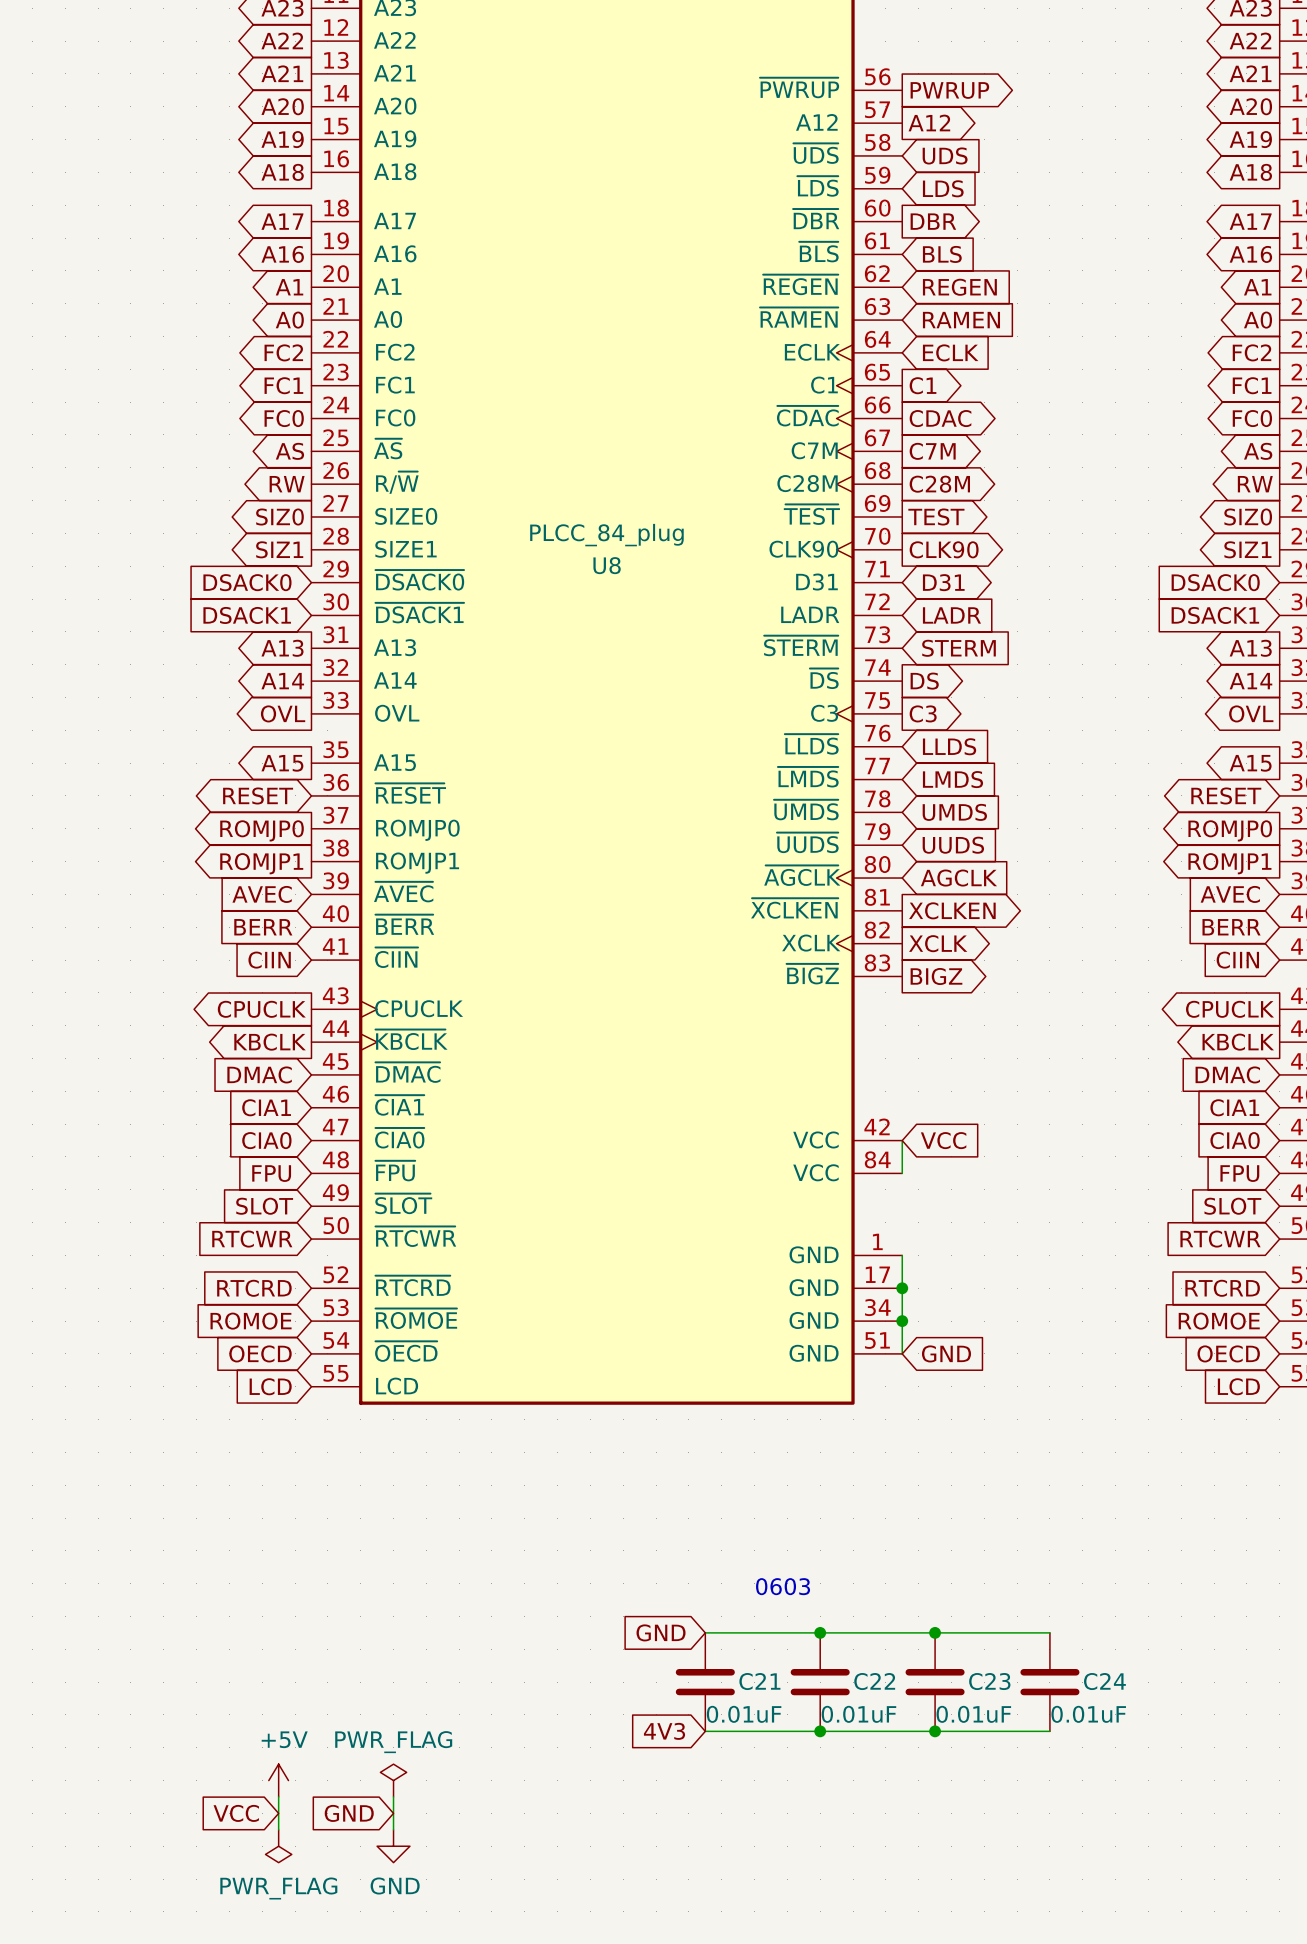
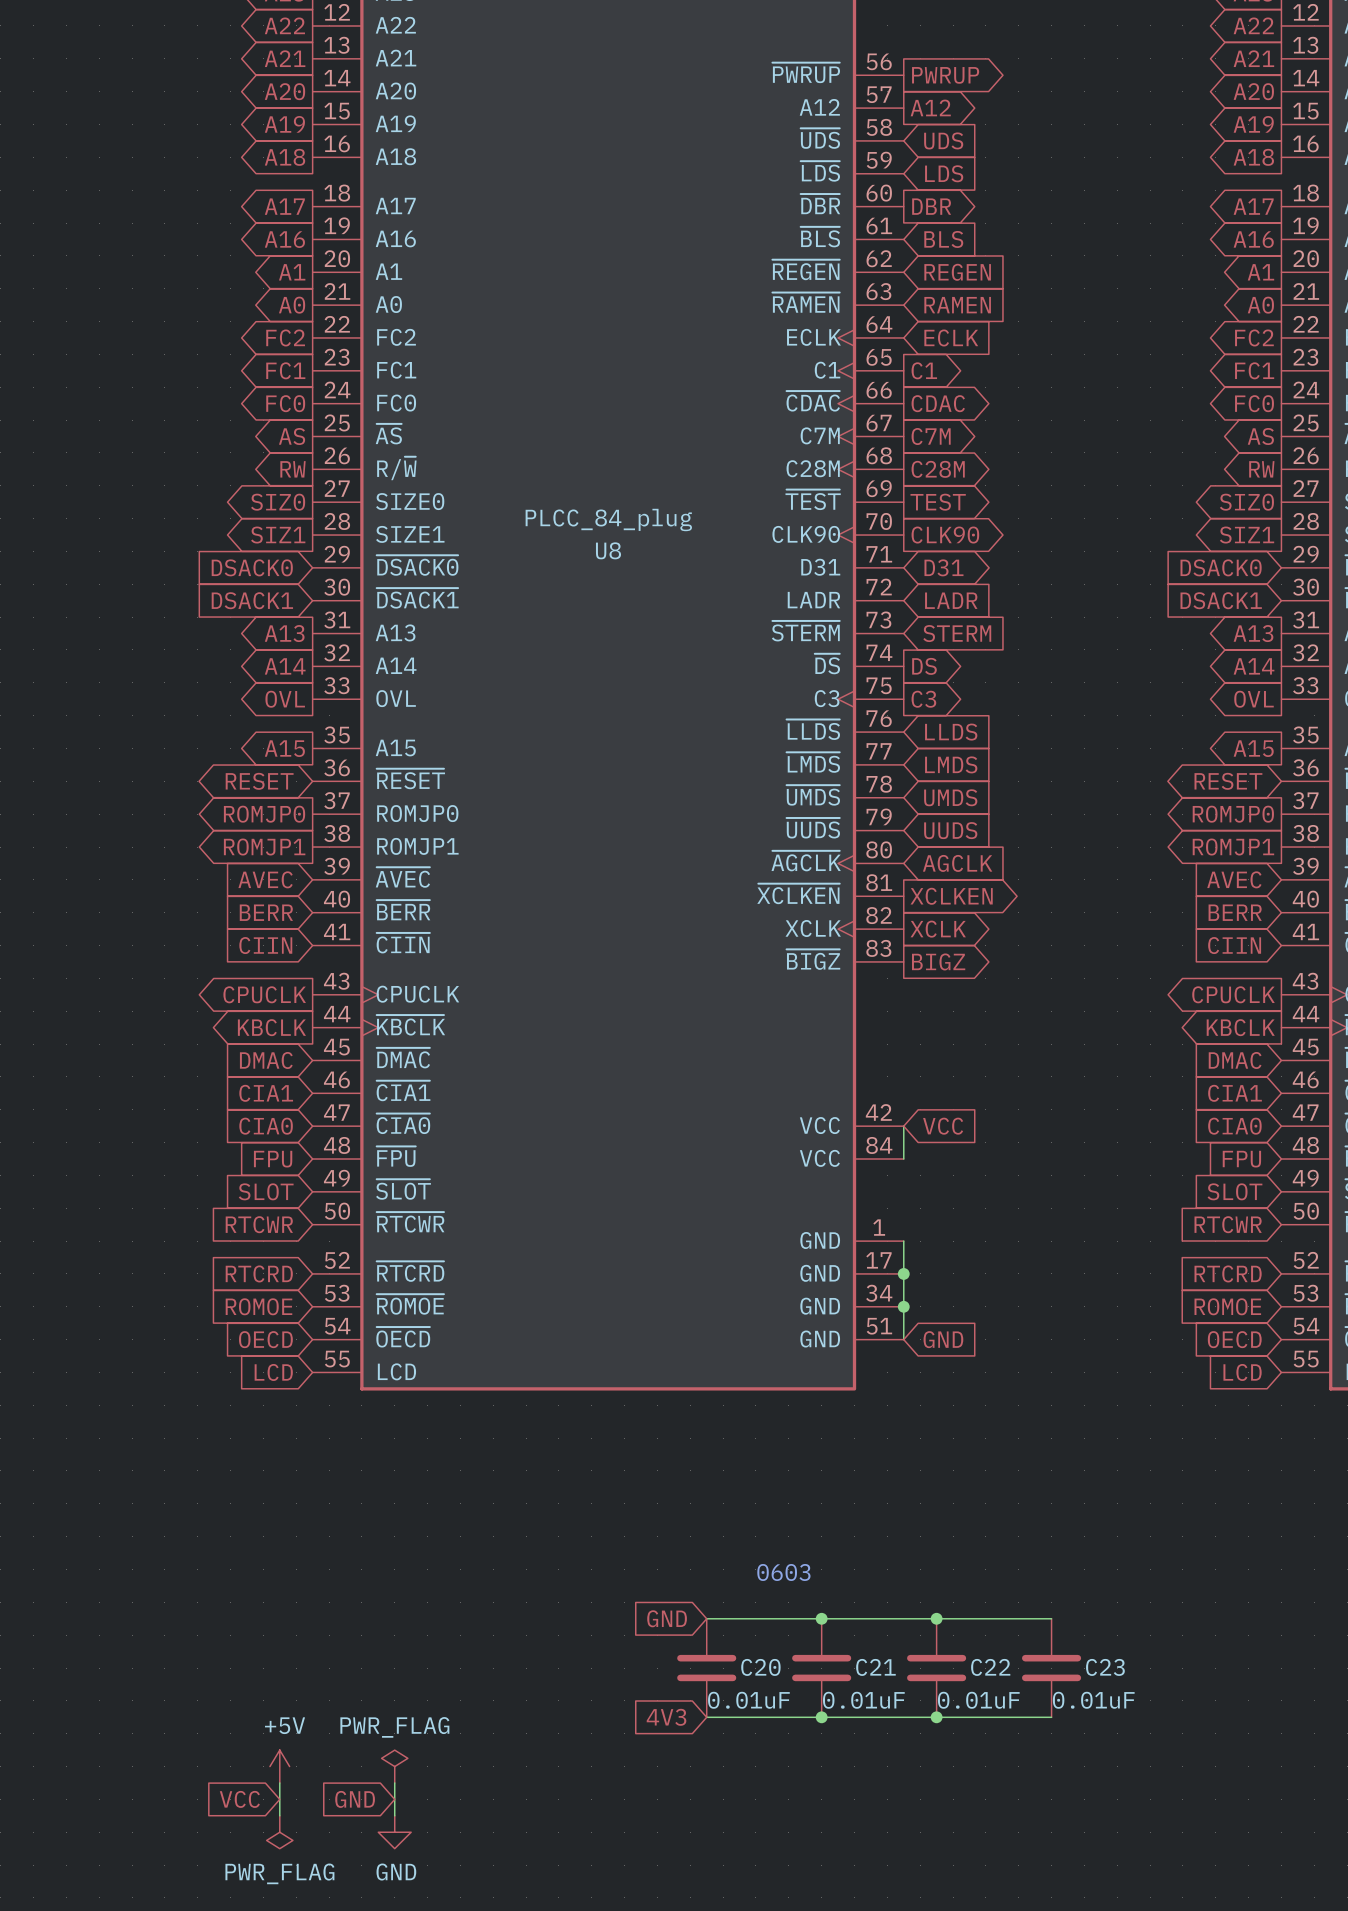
C21 name: C21 (759, 1681) -> C20 (760, 1667)
C22 name: C22 (874, 1681) -> C21 (875, 1667)
C23 name: C23 (989, 1681) -> C22 (990, 1667)
C24 name: C24 (1104, 1681) -> C23 (1105, 1667)

